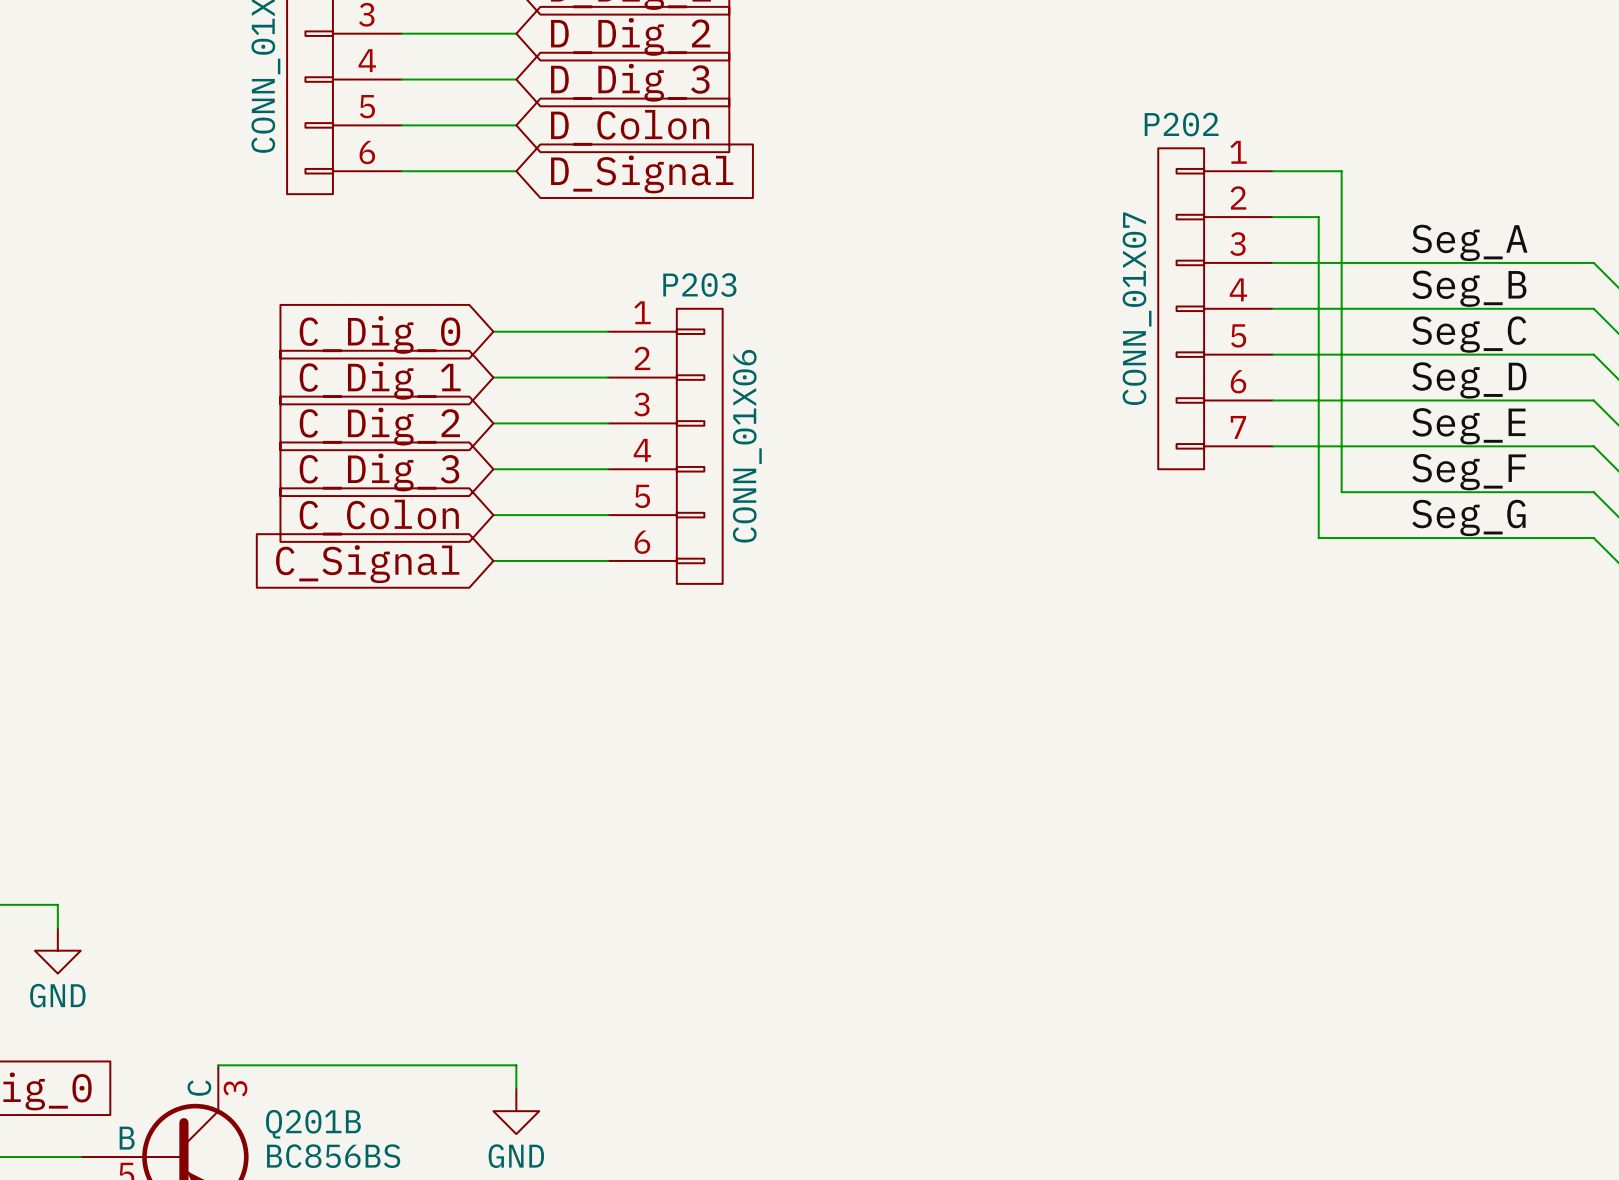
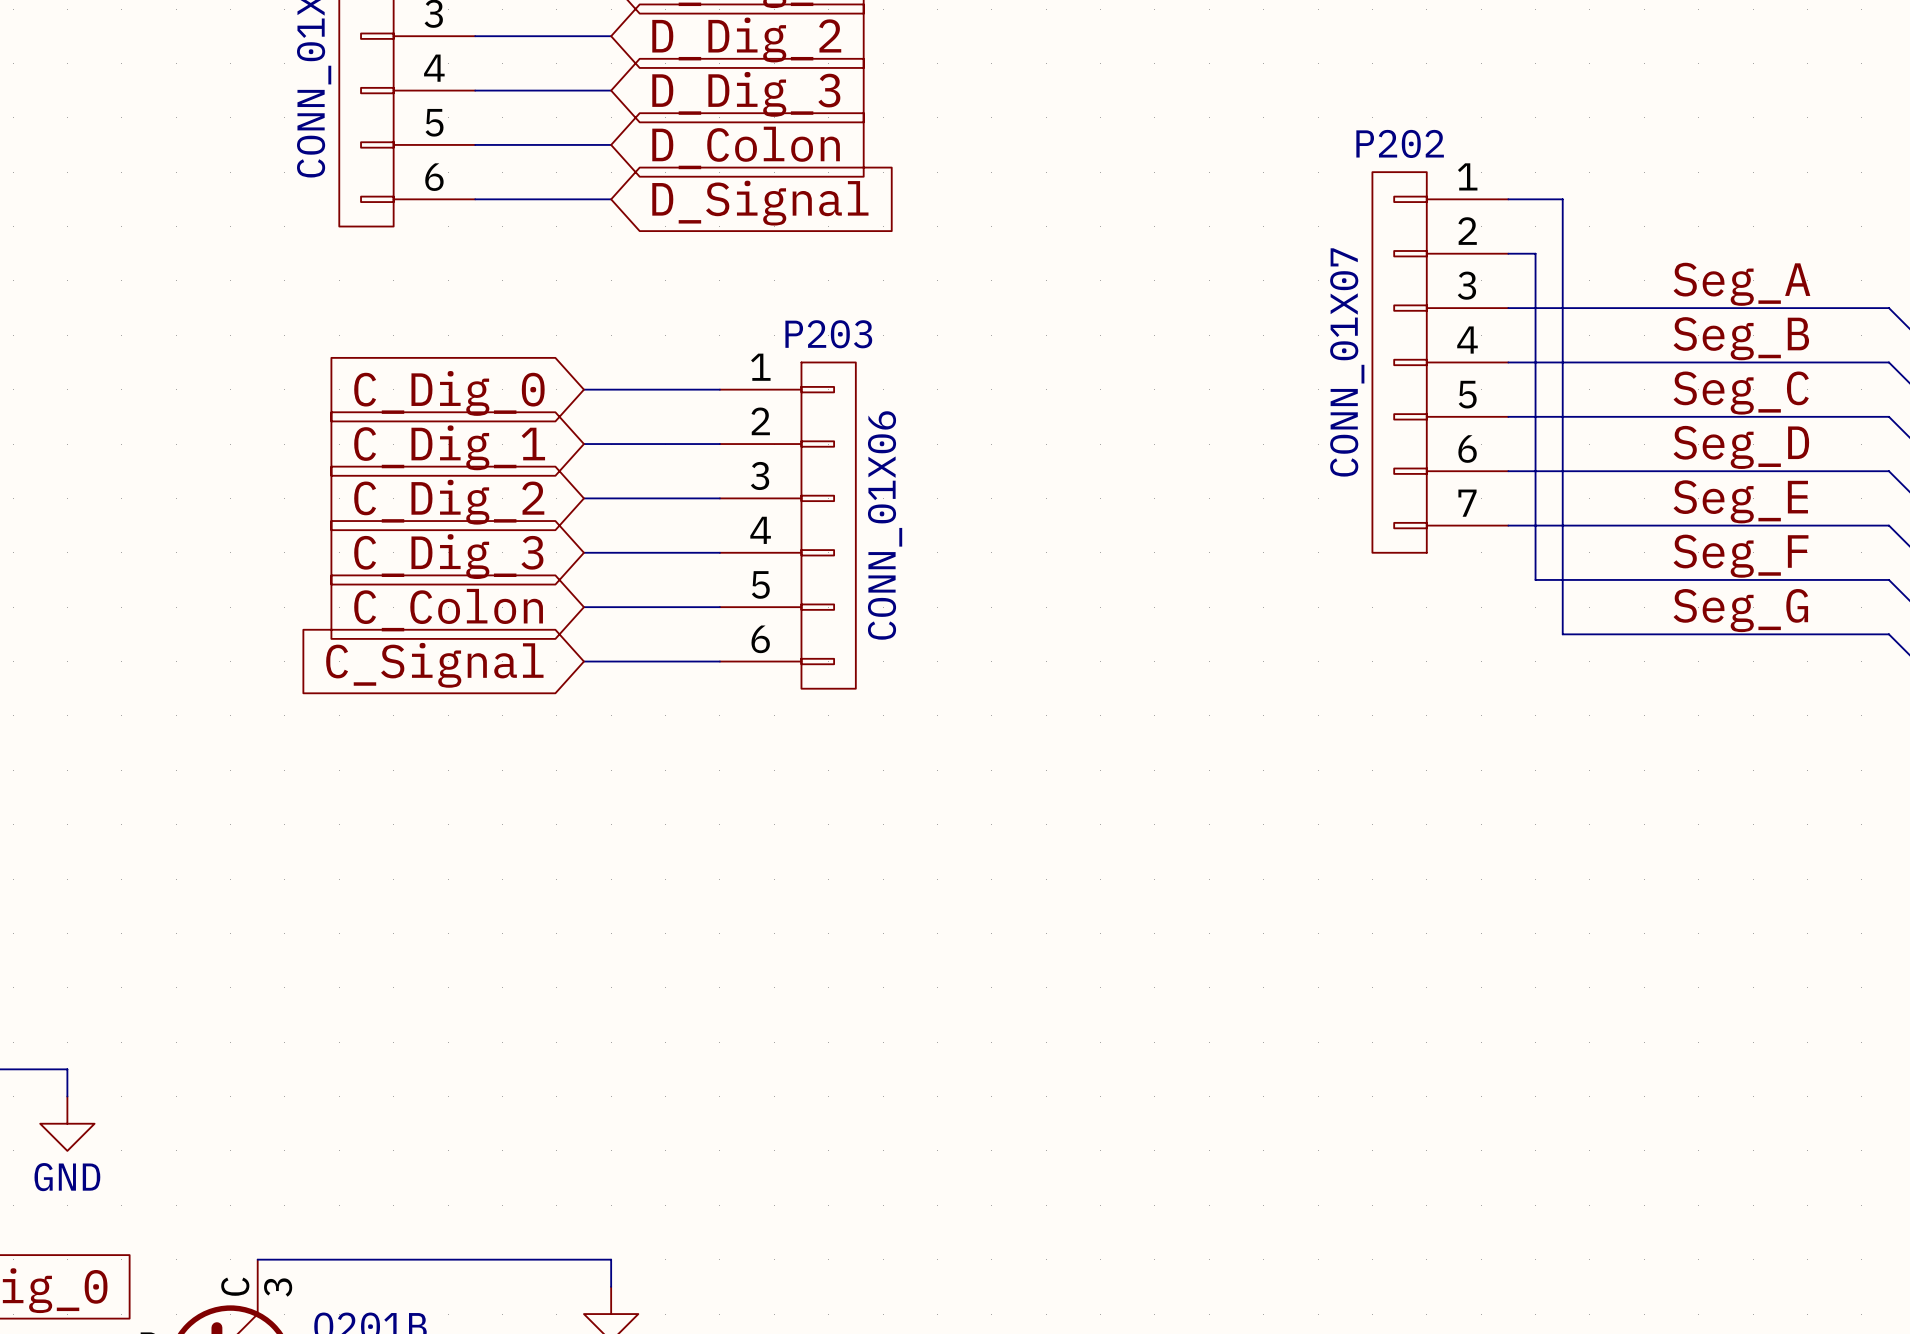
wire: (1318, 171) (1341, 171) (1341, 492) -> (1535, 253) (1535, 579) (1589, 579)
wire: (1295, 217) (1318, 217) -> (1562, 199) (1562, 253)

